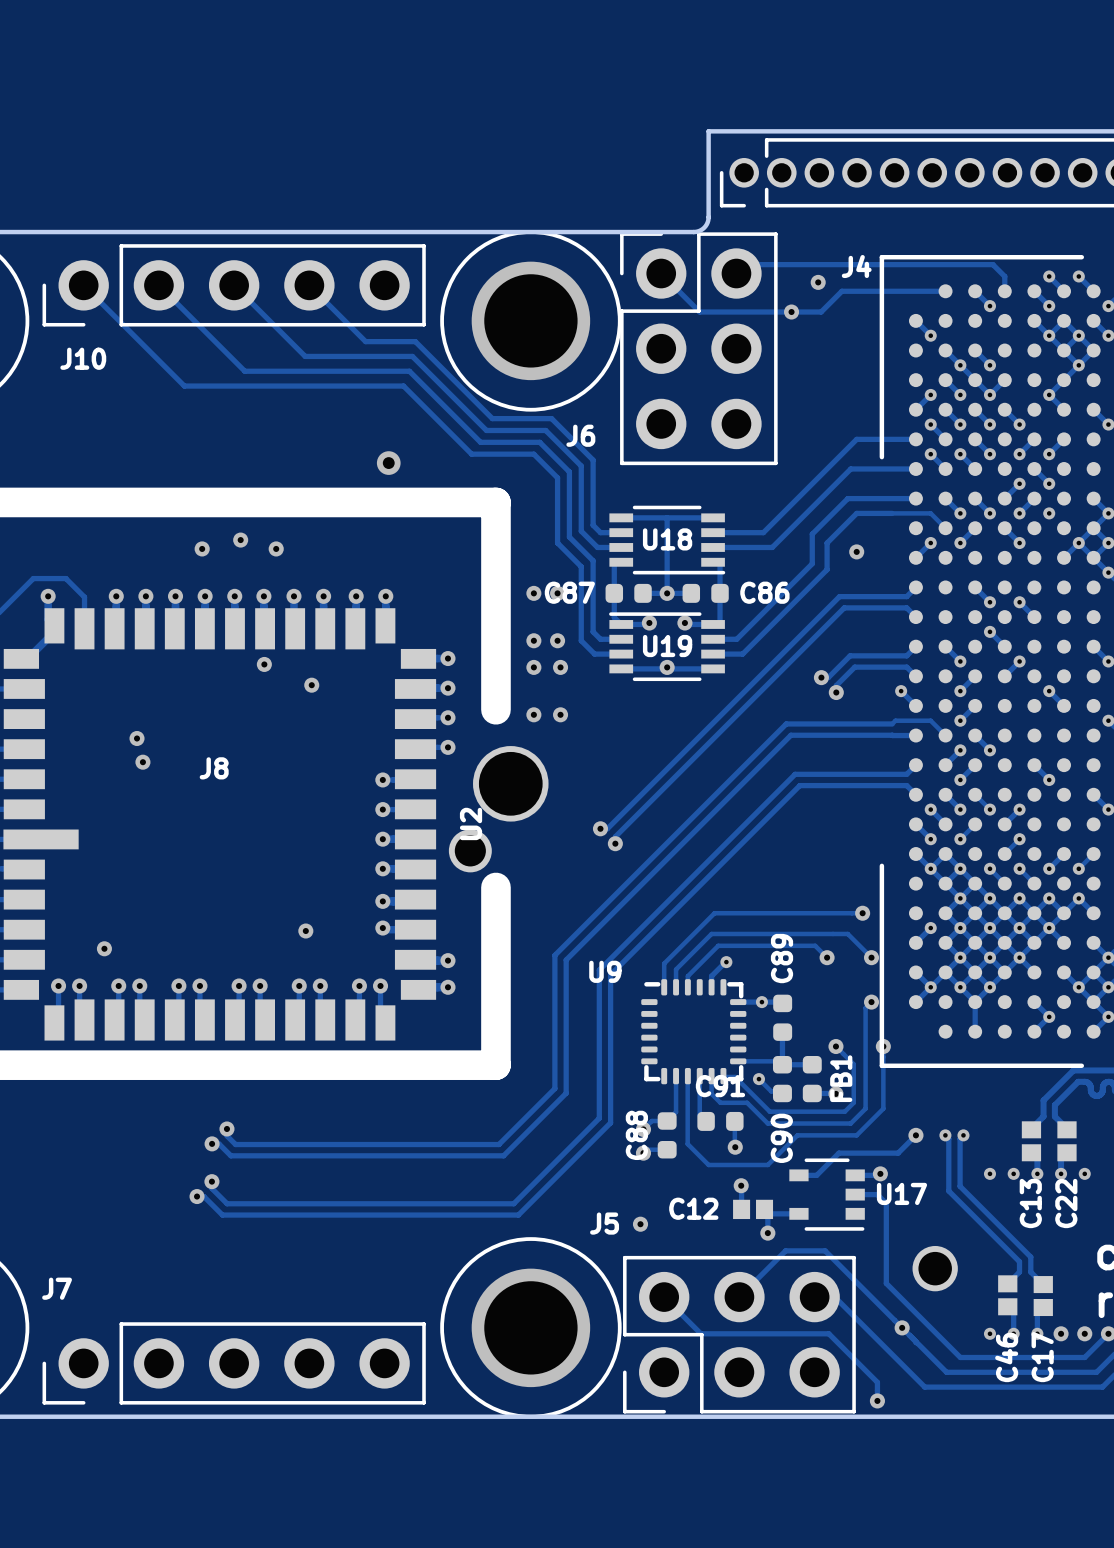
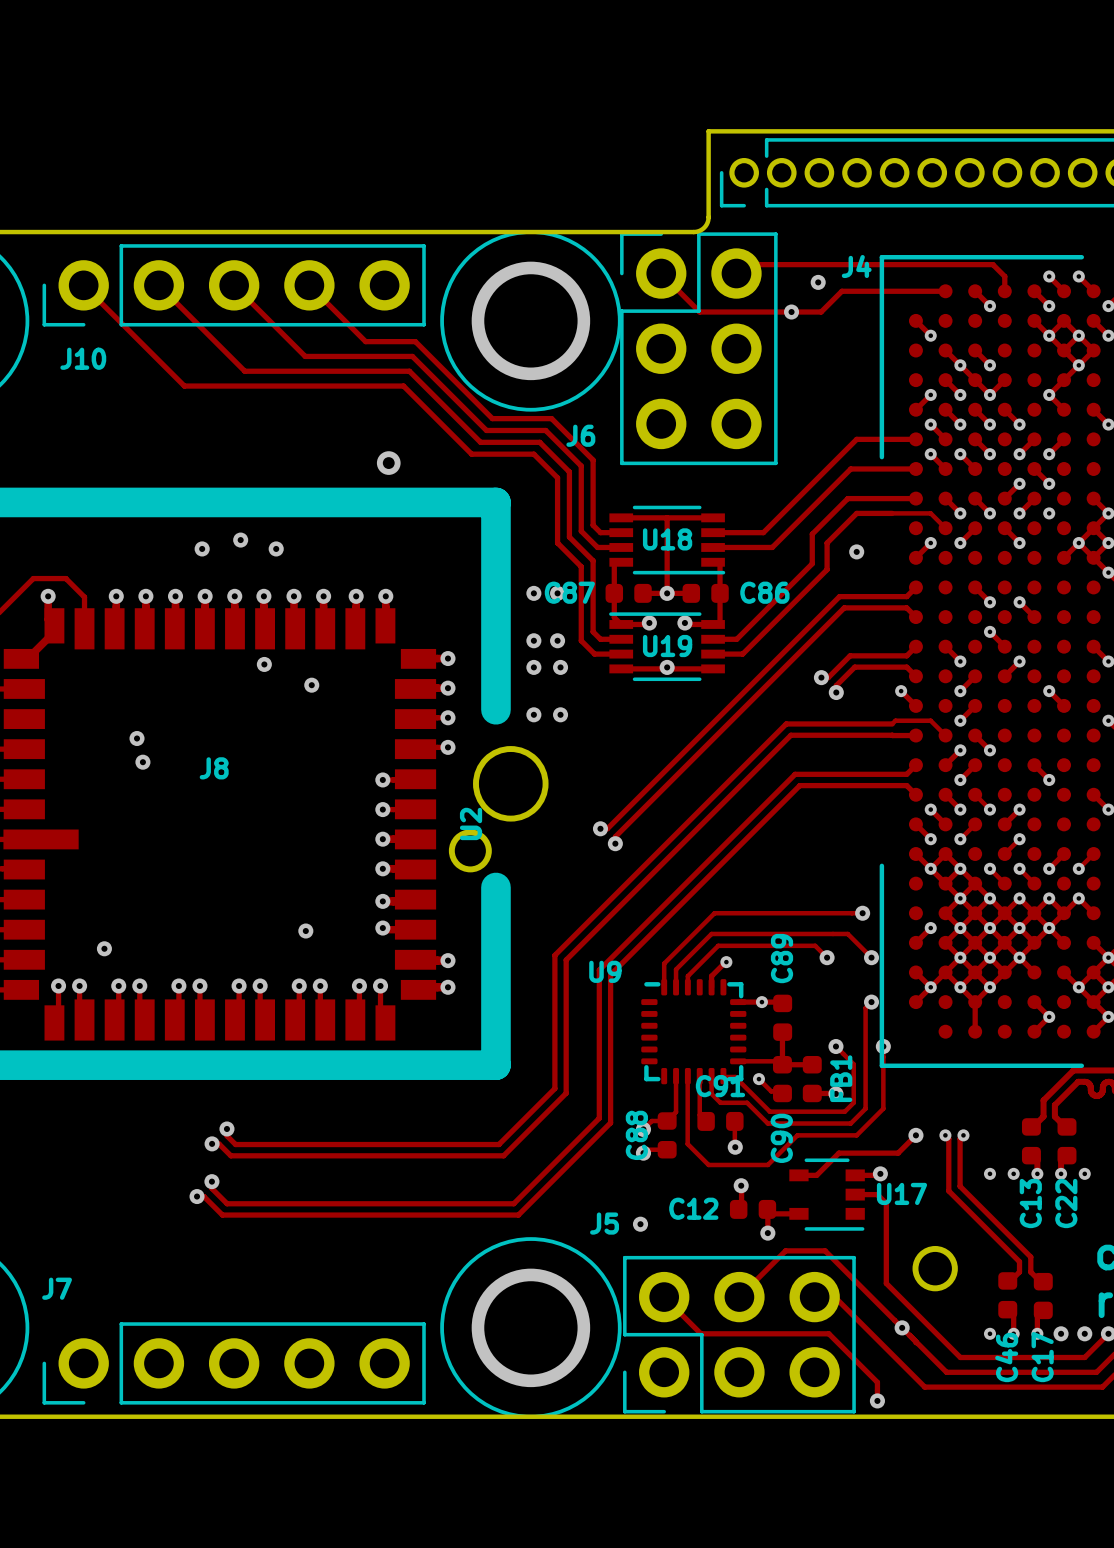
C13 footprint: [1021, 1121, 1042, 1162] -> [1021, 1118, 1041, 1165]
C22 footprint: [1057, 1121, 1077, 1162] -> [1057, 1118, 1077, 1165]
C12 footprint: [733, 1199, 774, 1220] -> [729, 1199, 777, 1219]
C46 footprint: [998, 1275, 1018, 1316] -> [998, 1272, 1018, 1319]
C17 footprint: [1033, 1276, 1053, 1317] -> [1033, 1272, 1053, 1320]

